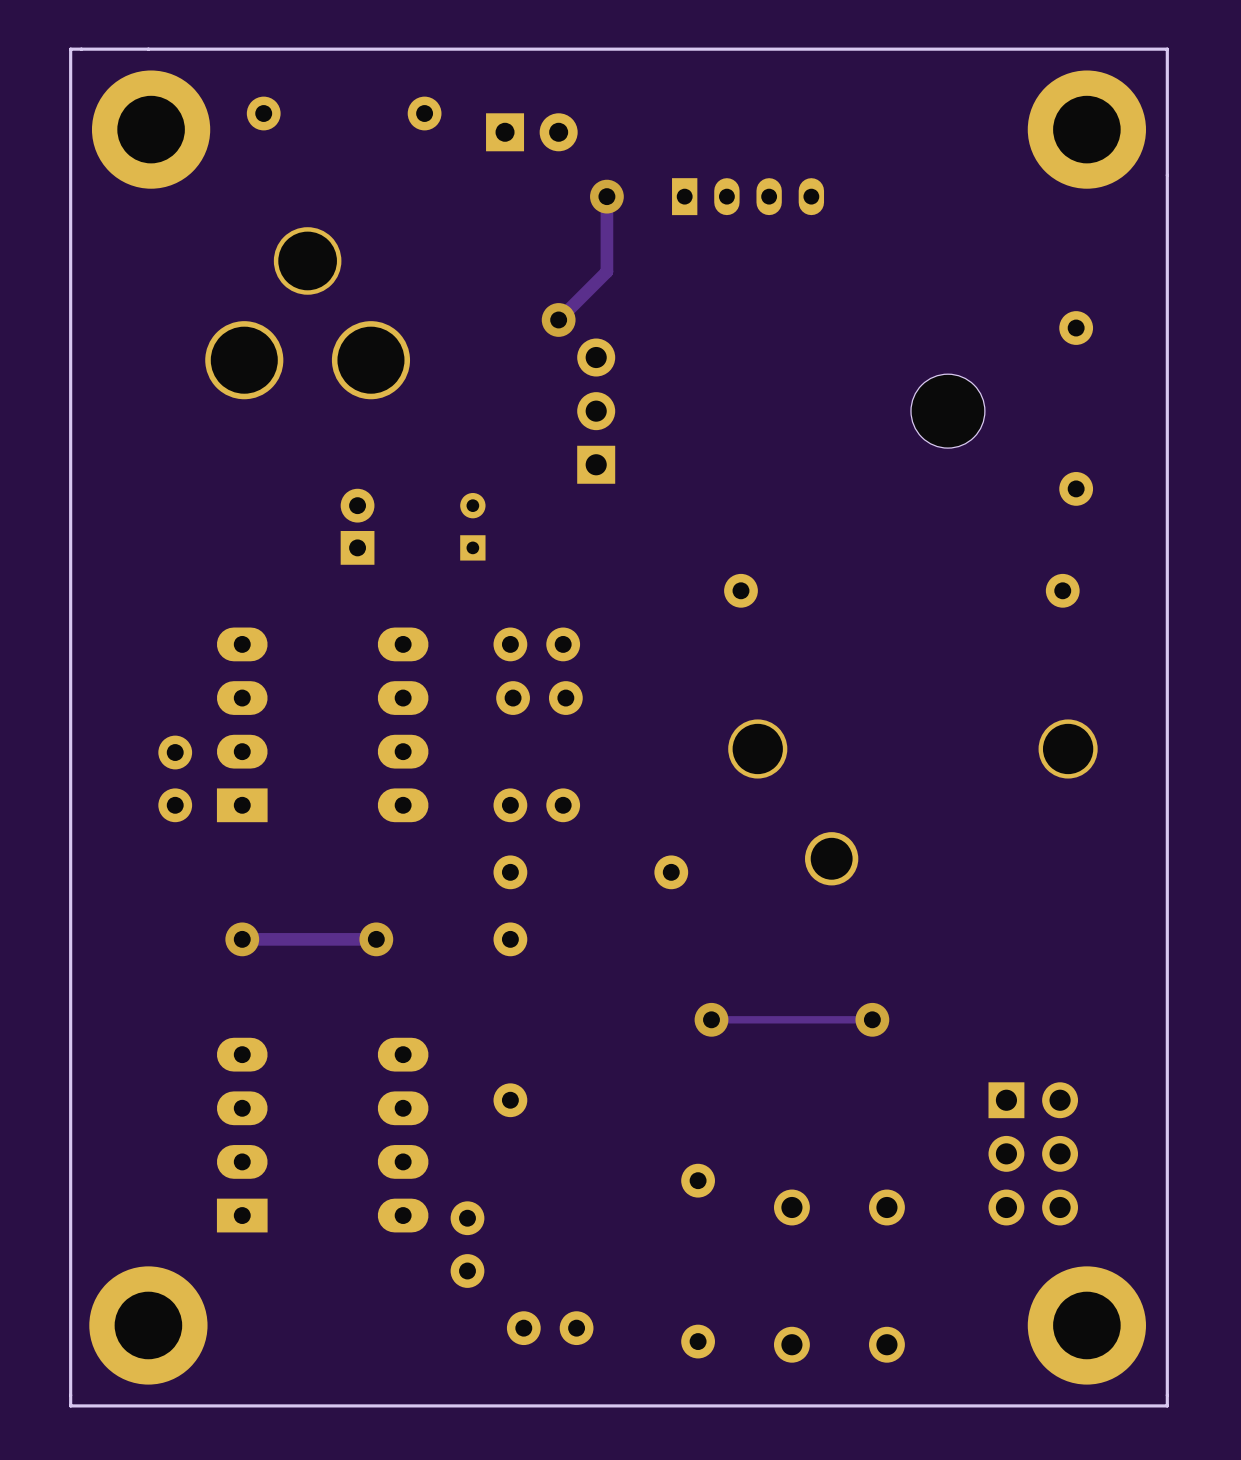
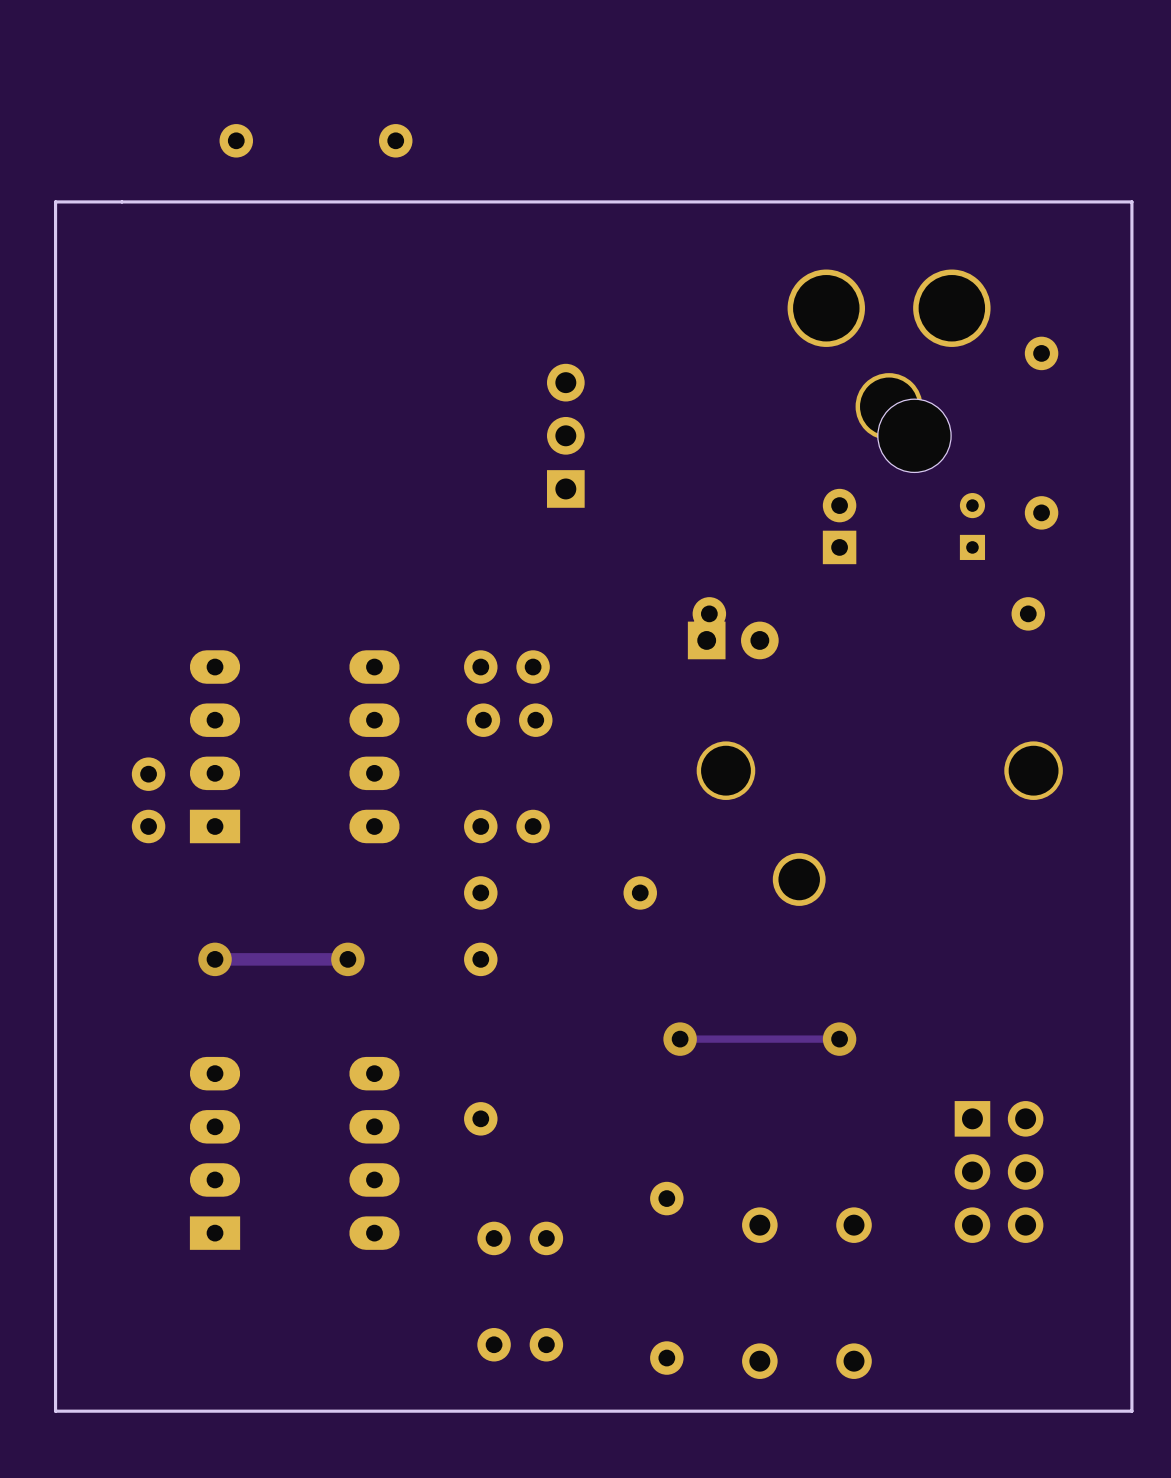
part: (151, 129) -> none
part: (1086, 129) -> none
part: (531, 132) -> none
board edge: (1167, 175) (1167, 49) (70, 49) (70, 1405) (1167, 1405) (1167, 1395) -> (1131, 201) (55, 201) (55, 1411) (1131, 1411)
track: (606, 196) (606, 271) (558, 319) -> none
via: (606, 196) -> none
part: (748, 196) -> none
part: (307, 313) -> none
via: (558, 319) -> none
part: none -> (889, 354)
part: none -> (972, 526)
part position: (357, 526) -> (839, 526)
part: (472, 526) -> none
part: none -> (733, 640)
part rotation: 0° (467, 1244) -> 90° clockwise (520, 1238)
part position: (467, 1244) -> (520, 1238)
part: (148, 1325) -> none
part: (1086, 1325) -> none

